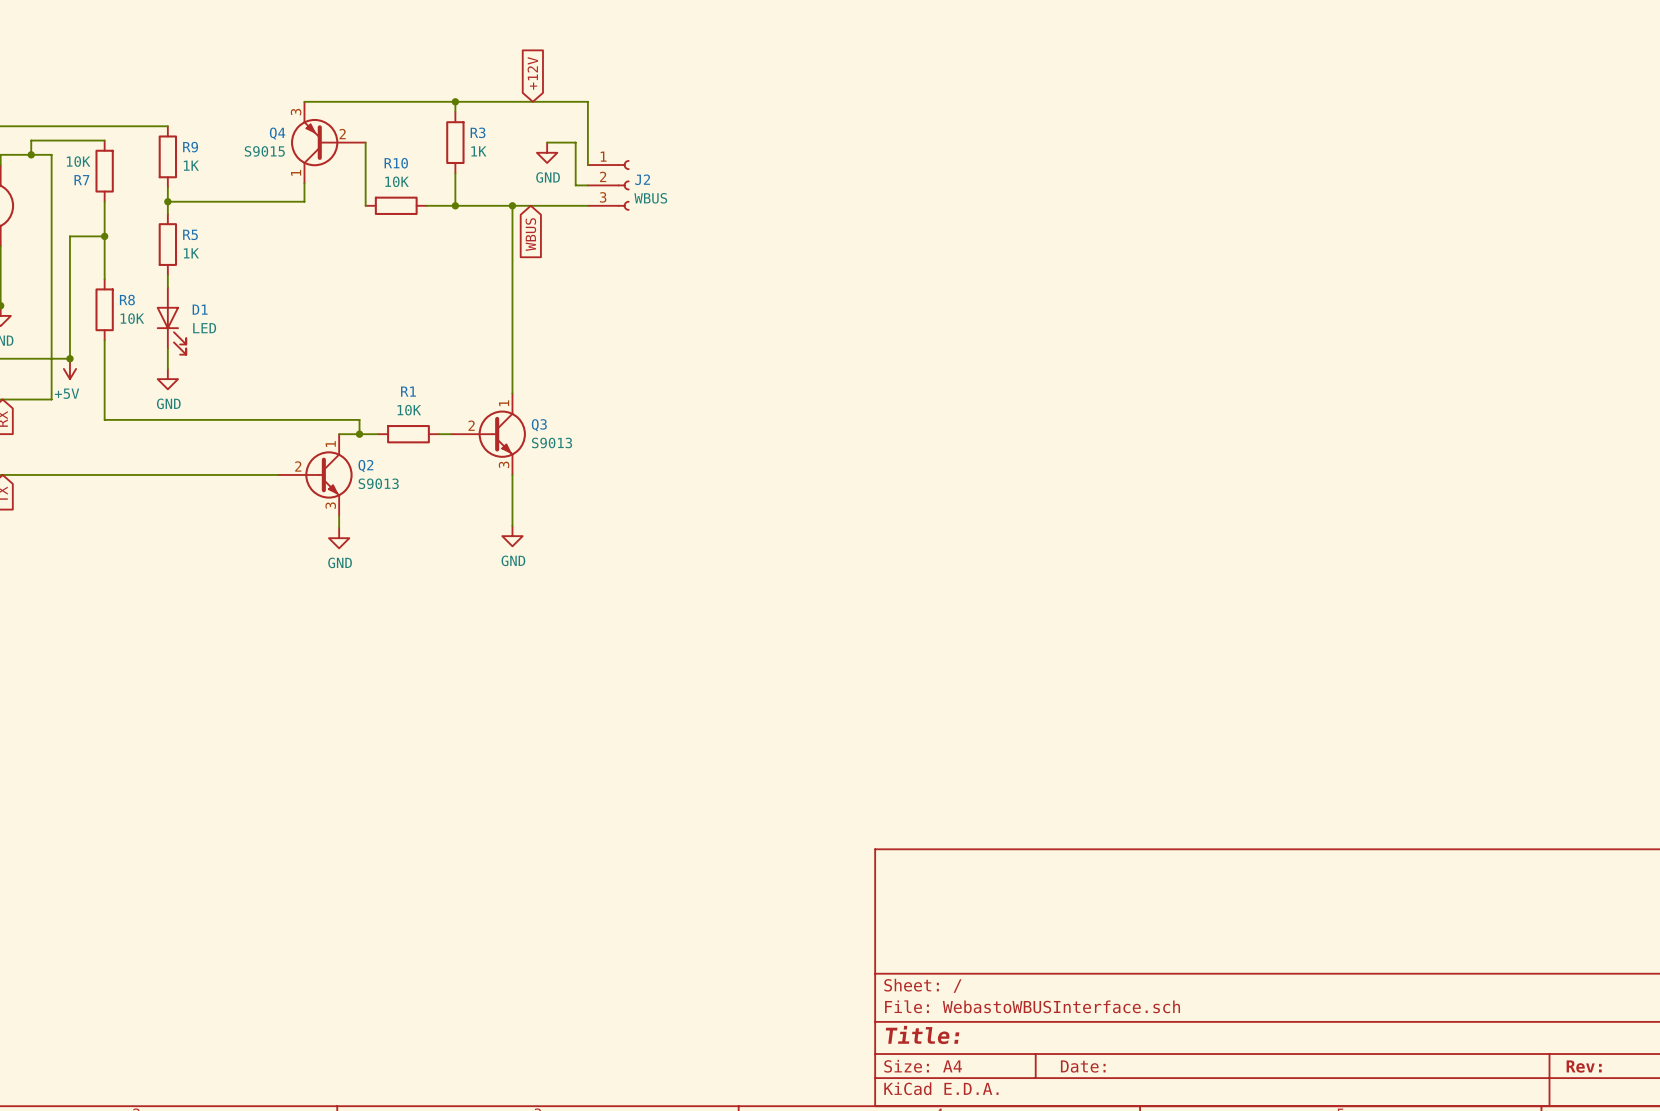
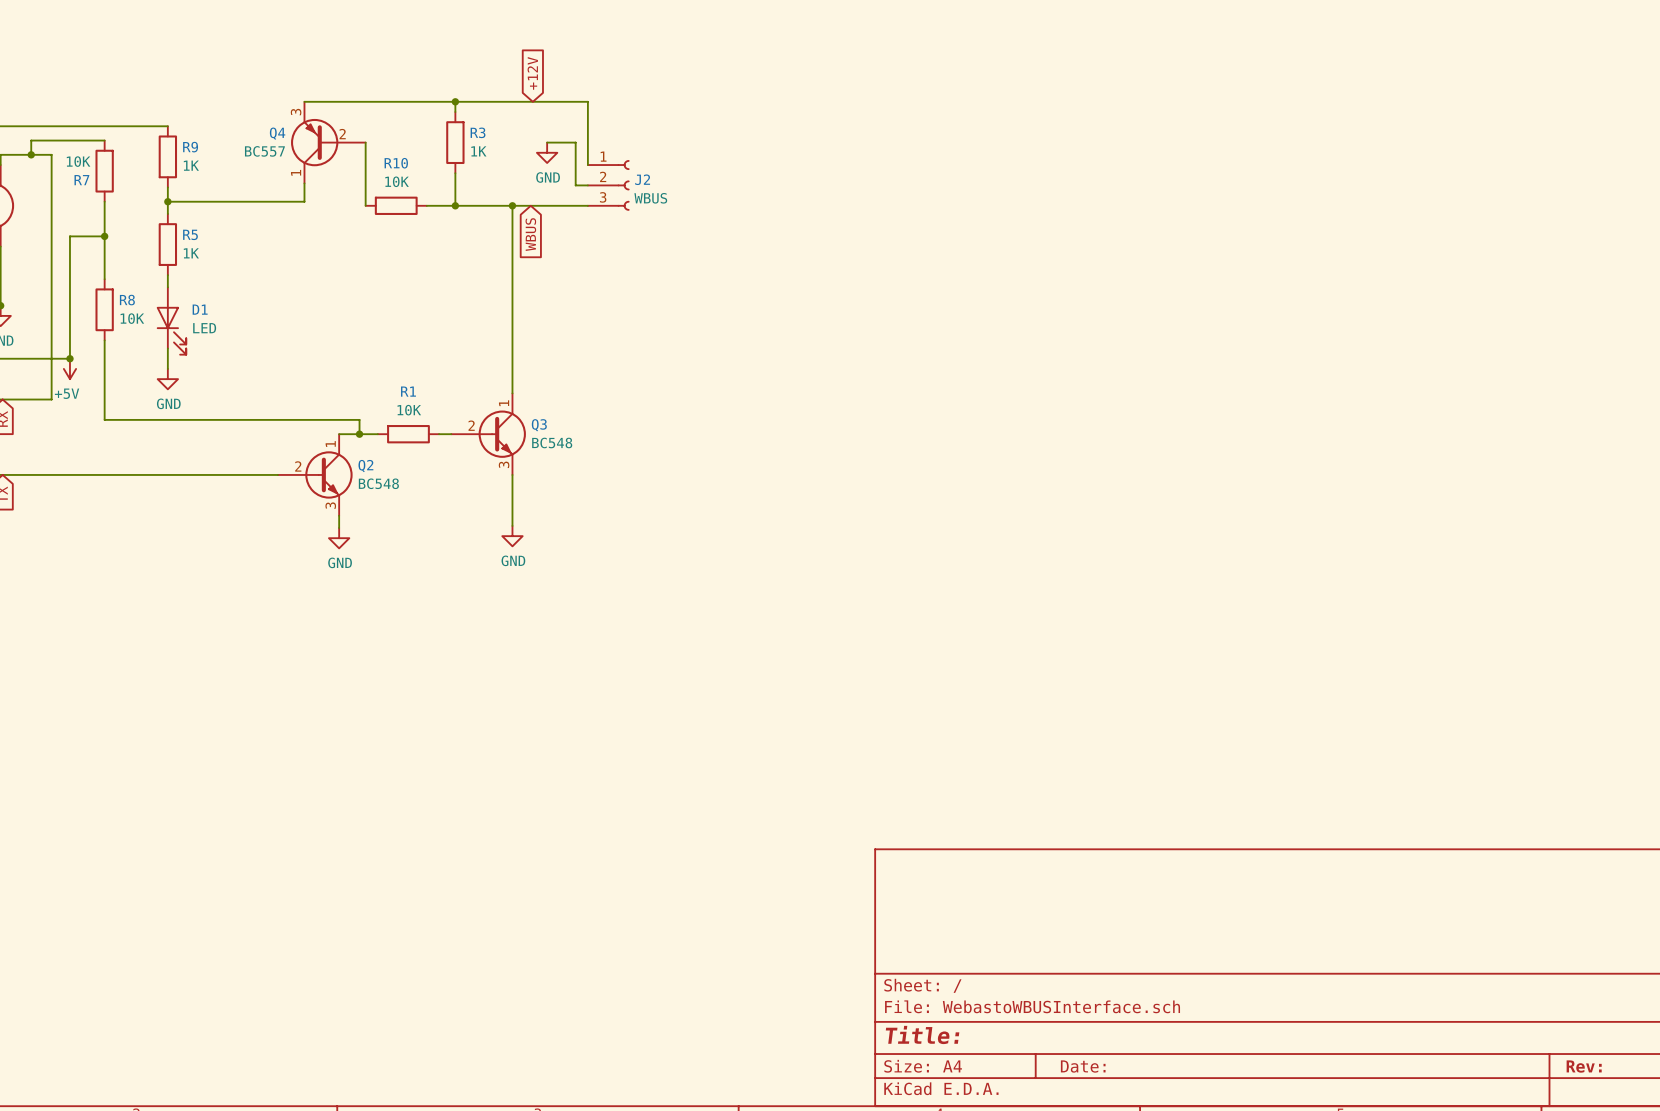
Q4 value: S9015 (264, 151) -> BC557 (264, 151)
Q3 value: S9013 (552, 442) -> BC548 (552, 442)
Q2 value: S9013 (378, 483) -> BC548 (378, 483)

